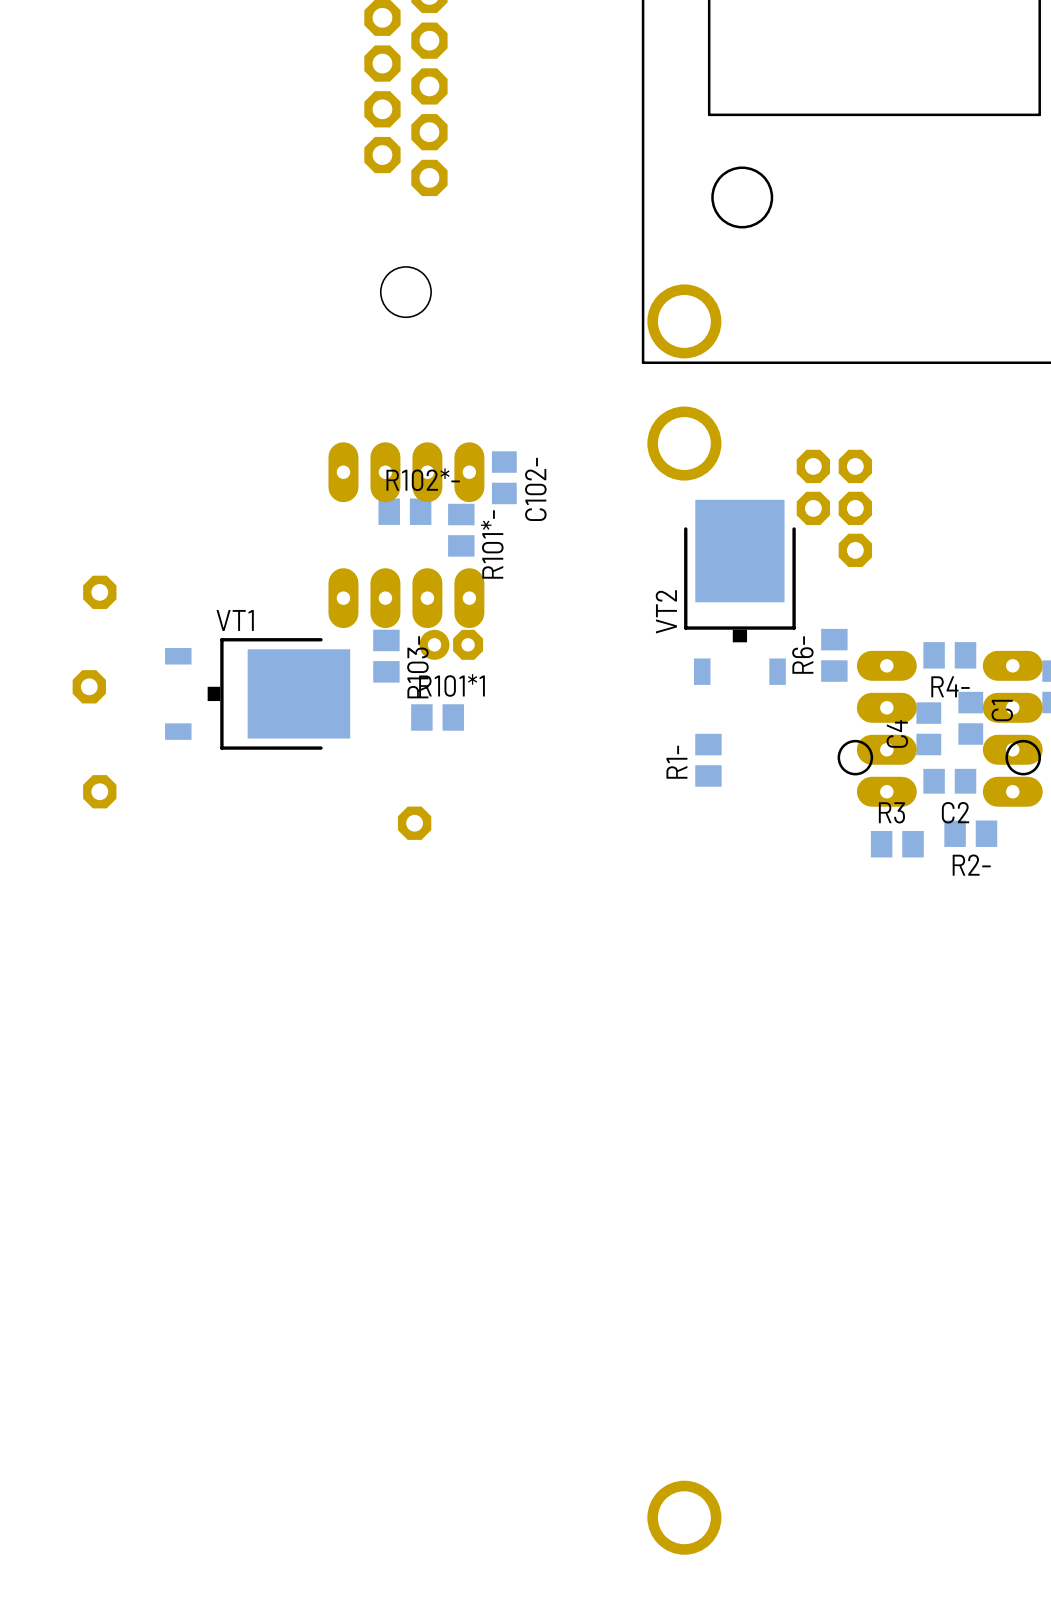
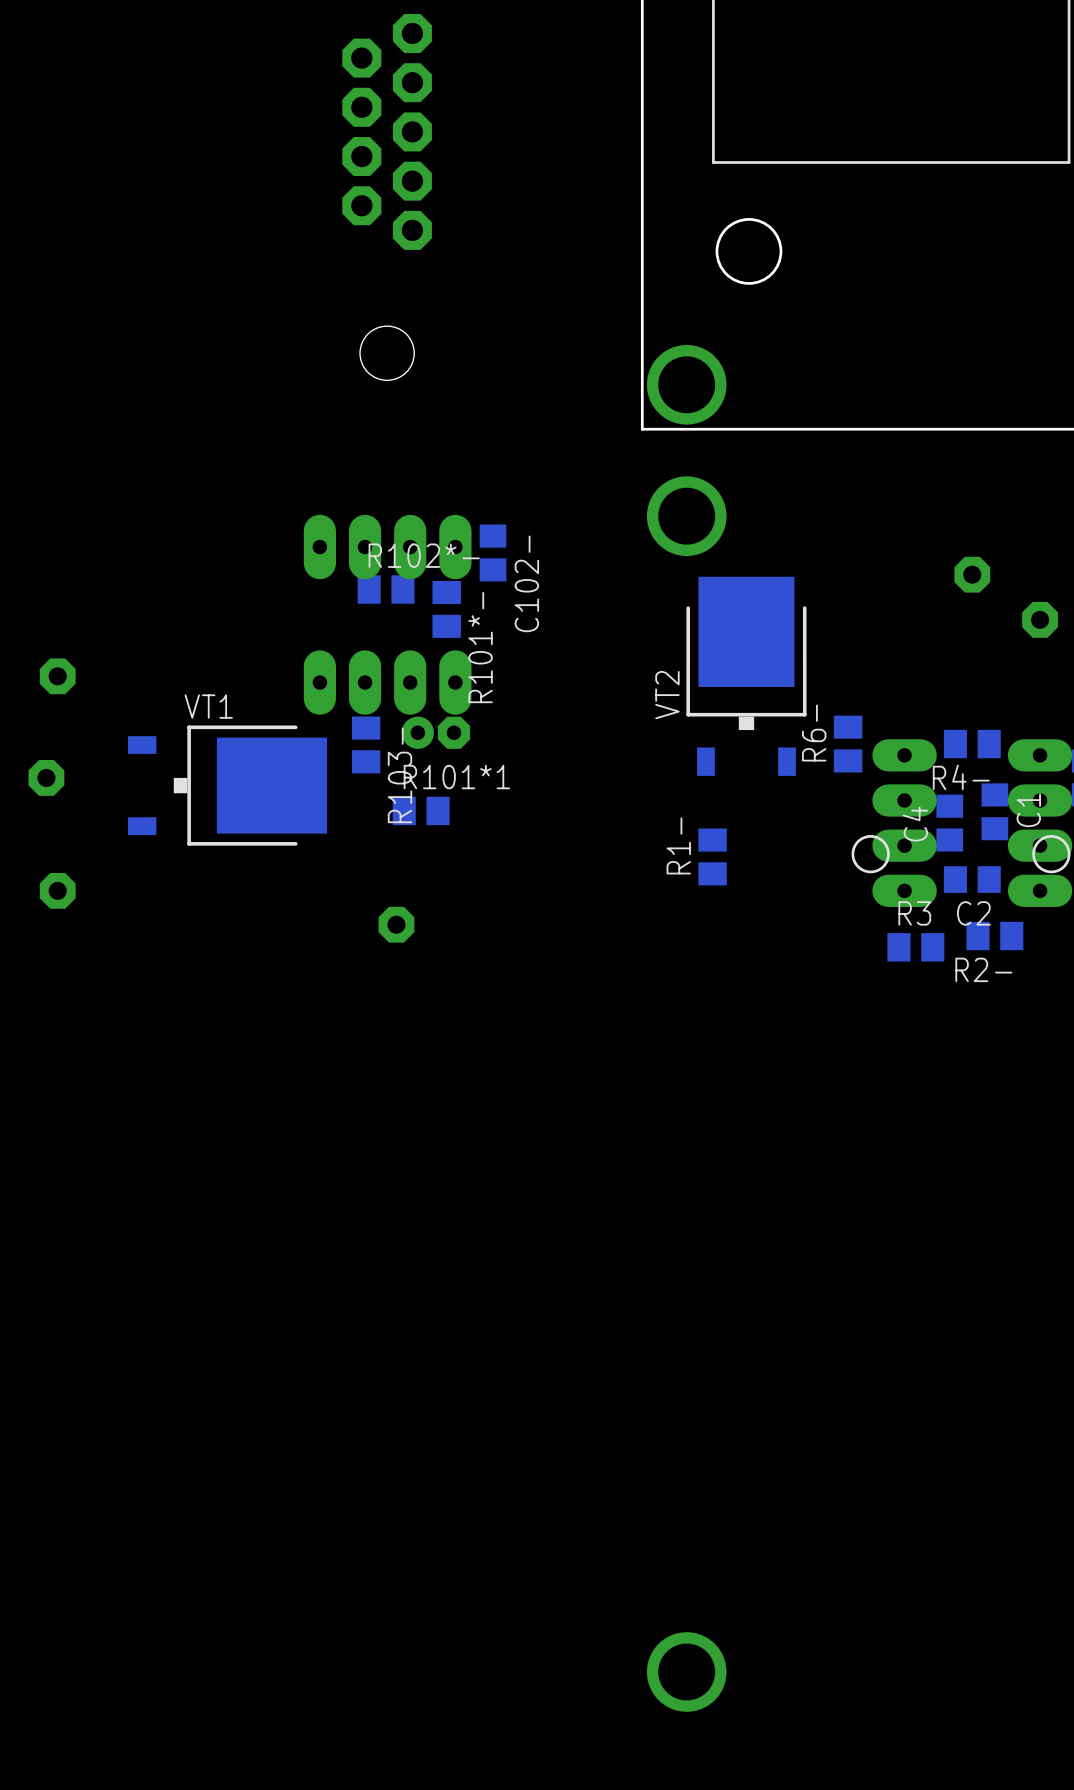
part: (813, 466) -> none
part: (855, 466) -> none
part: none -> (972, 574)
part: (813, 508) -> none
part: (855, 508) -> none
part: none -> (1040, 619)
part: (855, 550) -> none

